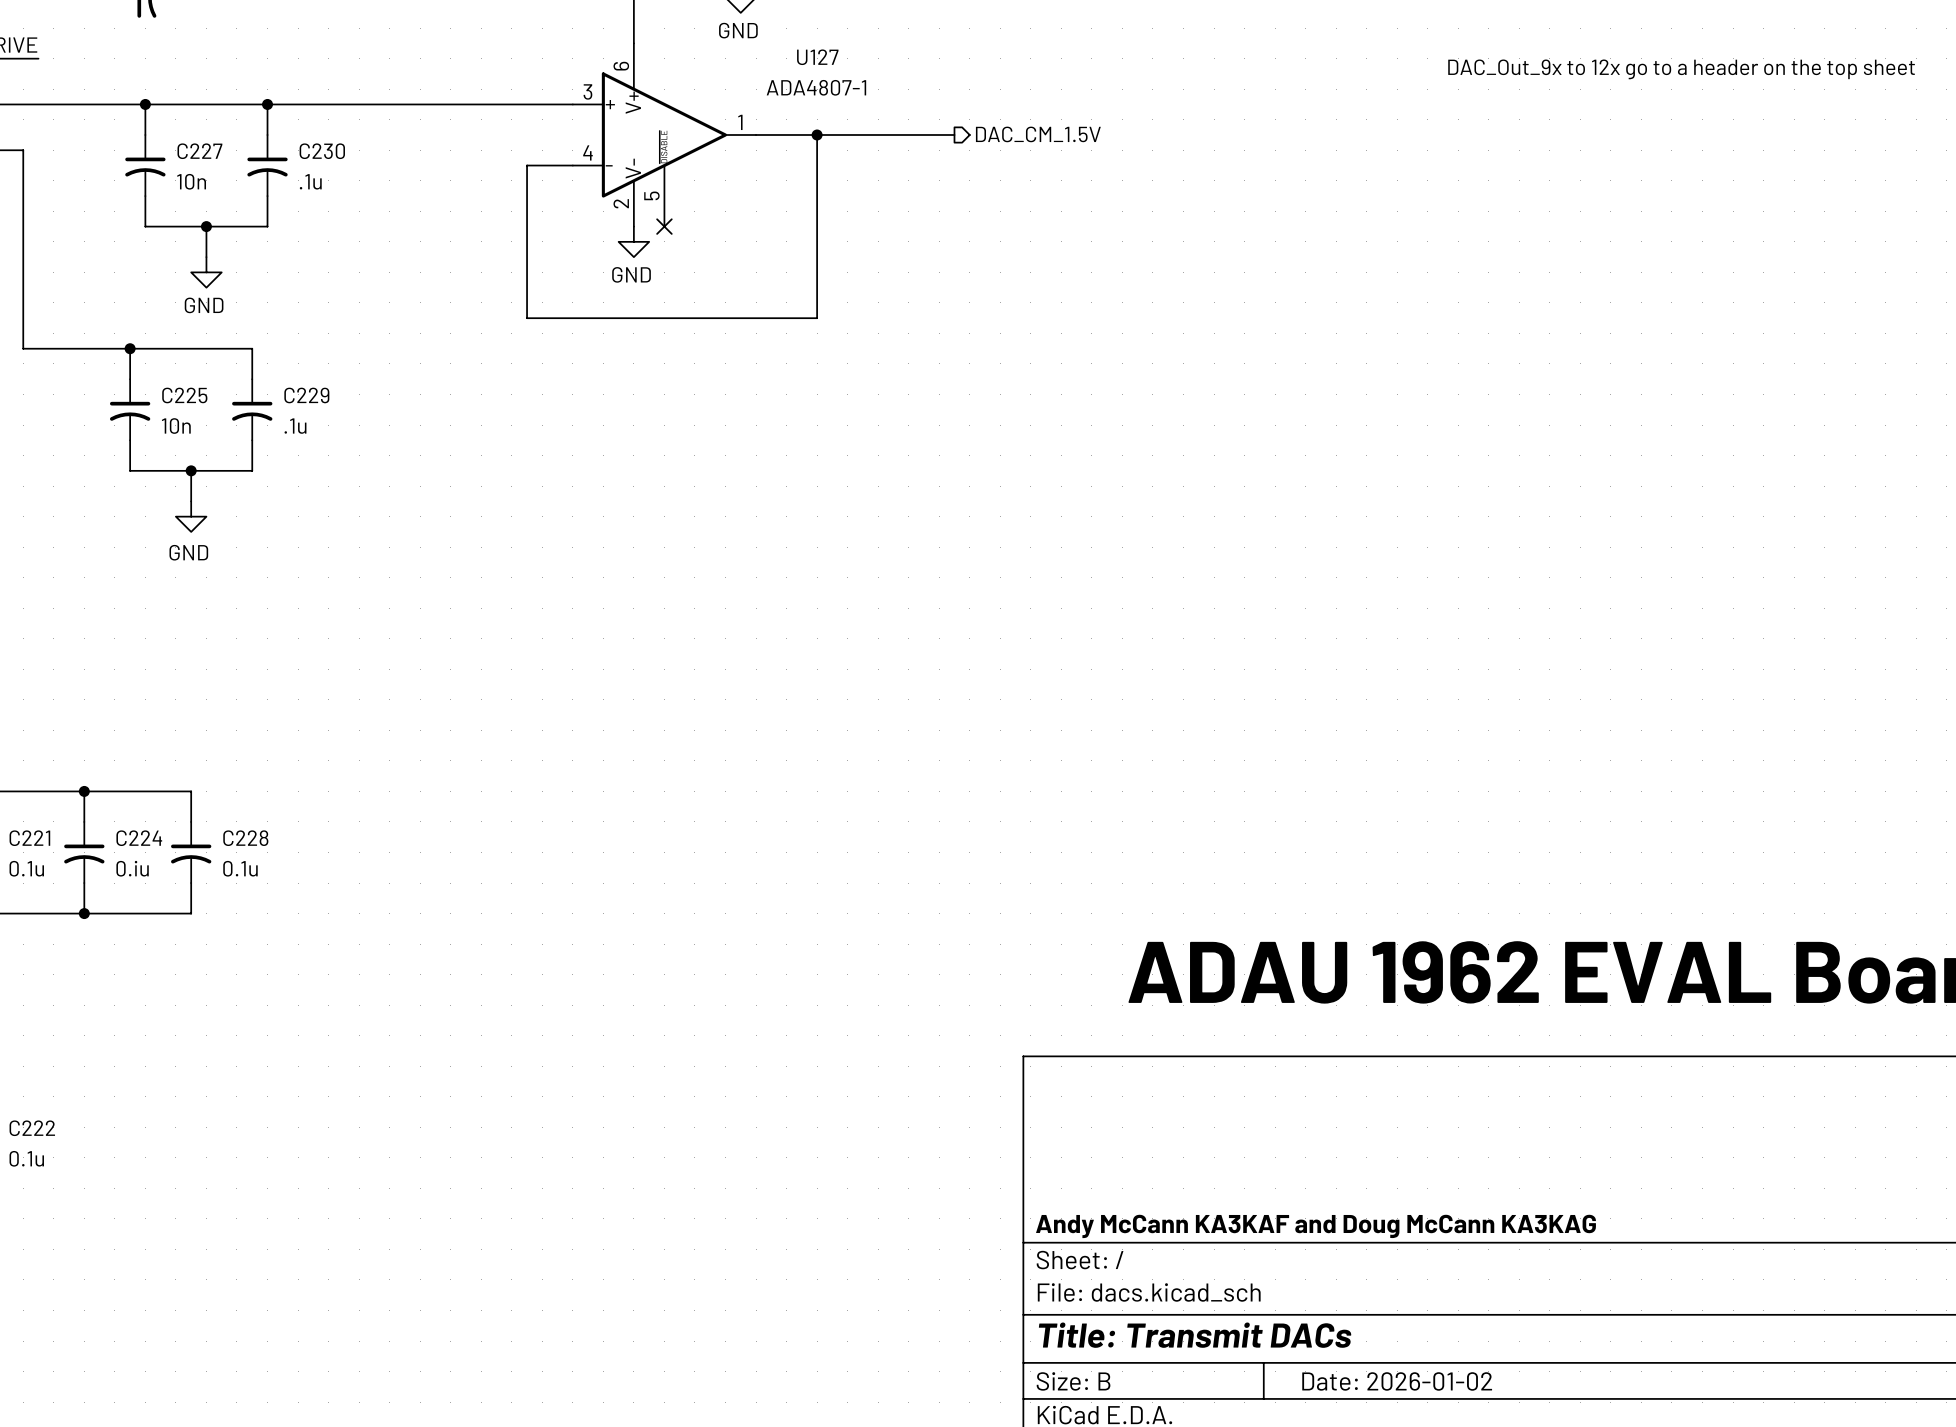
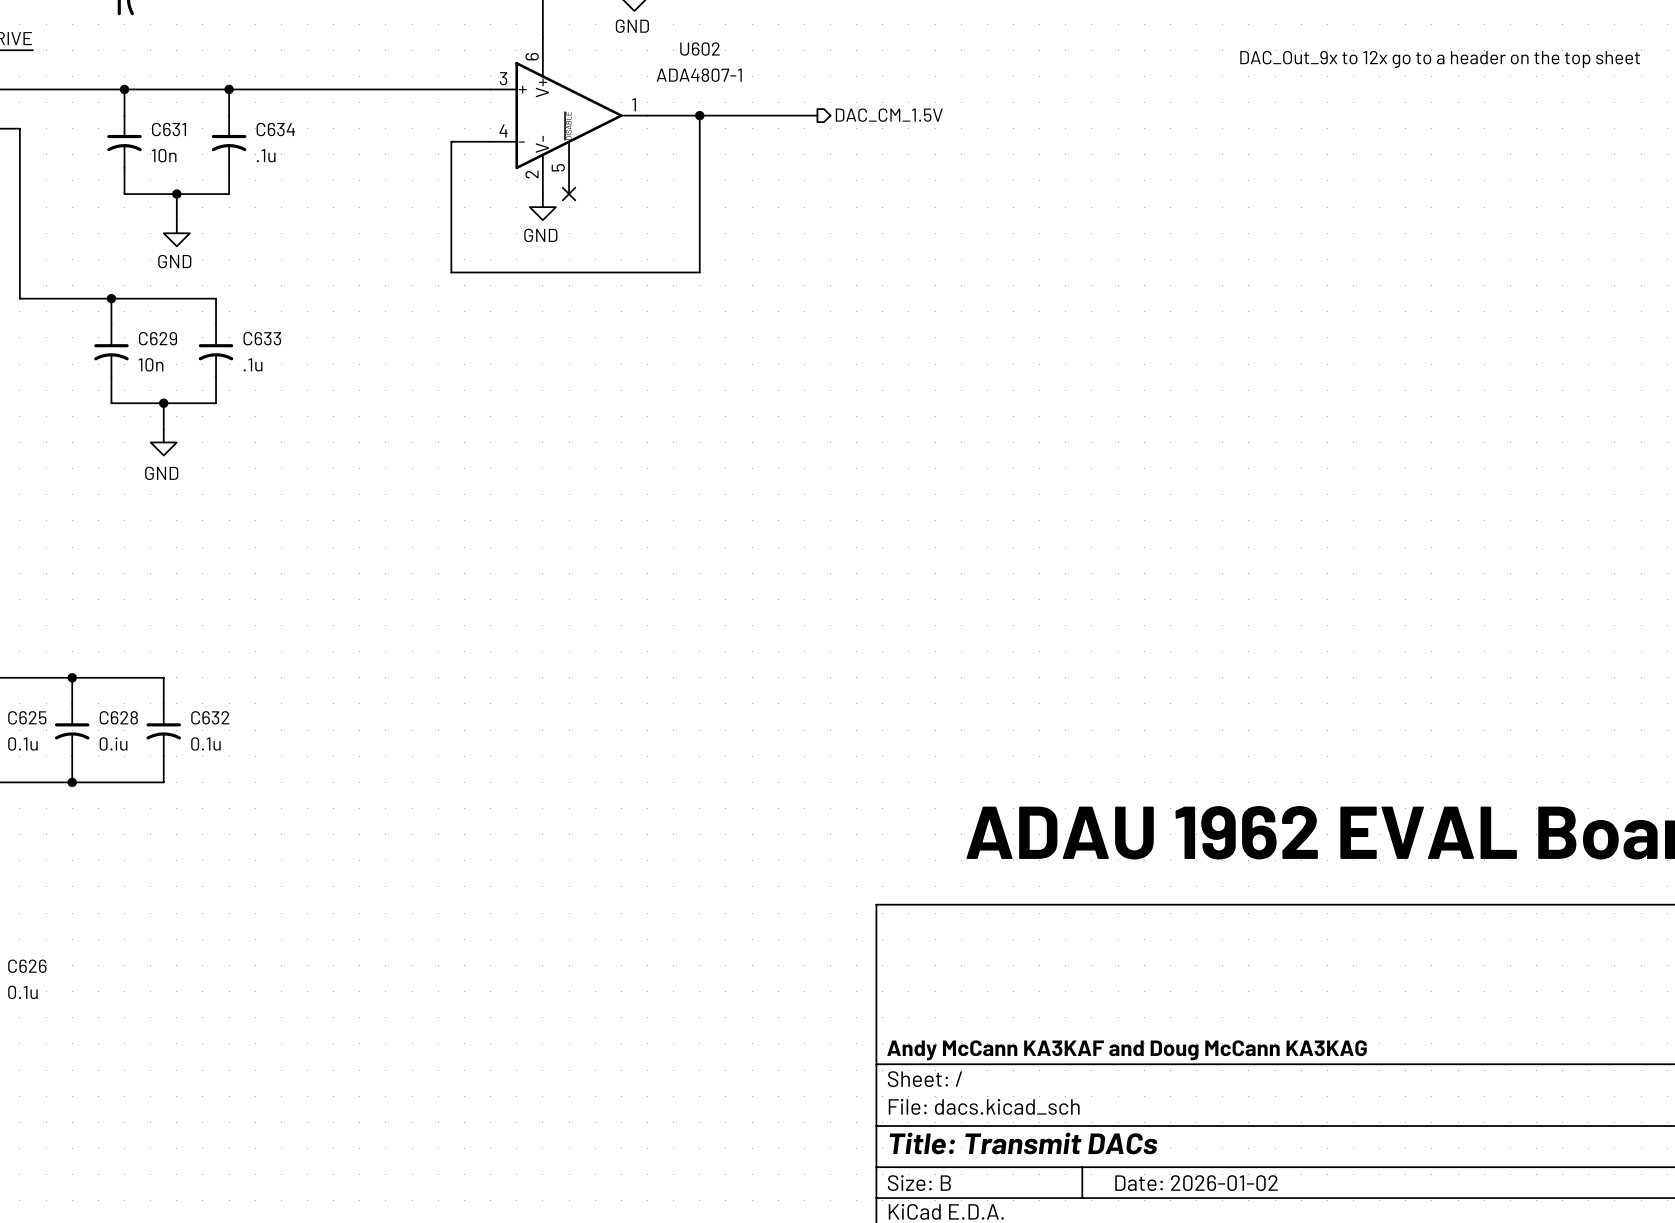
U127 name: U127 (817, 57) -> U602 (700, 49)
C227 name: C227 (199, 151) -> C631 (169, 129)
C230 name: C230 (322, 151) -> C634 (275, 129)
C225 name: C225 (184, 395) -> C629 (157, 338)
C229 name: C229 (306, 395) -> C633 (262, 338)
C221 name: C221 (29, 838) -> C625 (27, 717)
C224 name: C224 (139, 838) -> C628 (118, 717)
C228 name: C228 (245, 838) -> C632 (210, 717)
C222 name: C222 (32, 1128) -> C626 (27, 966)

